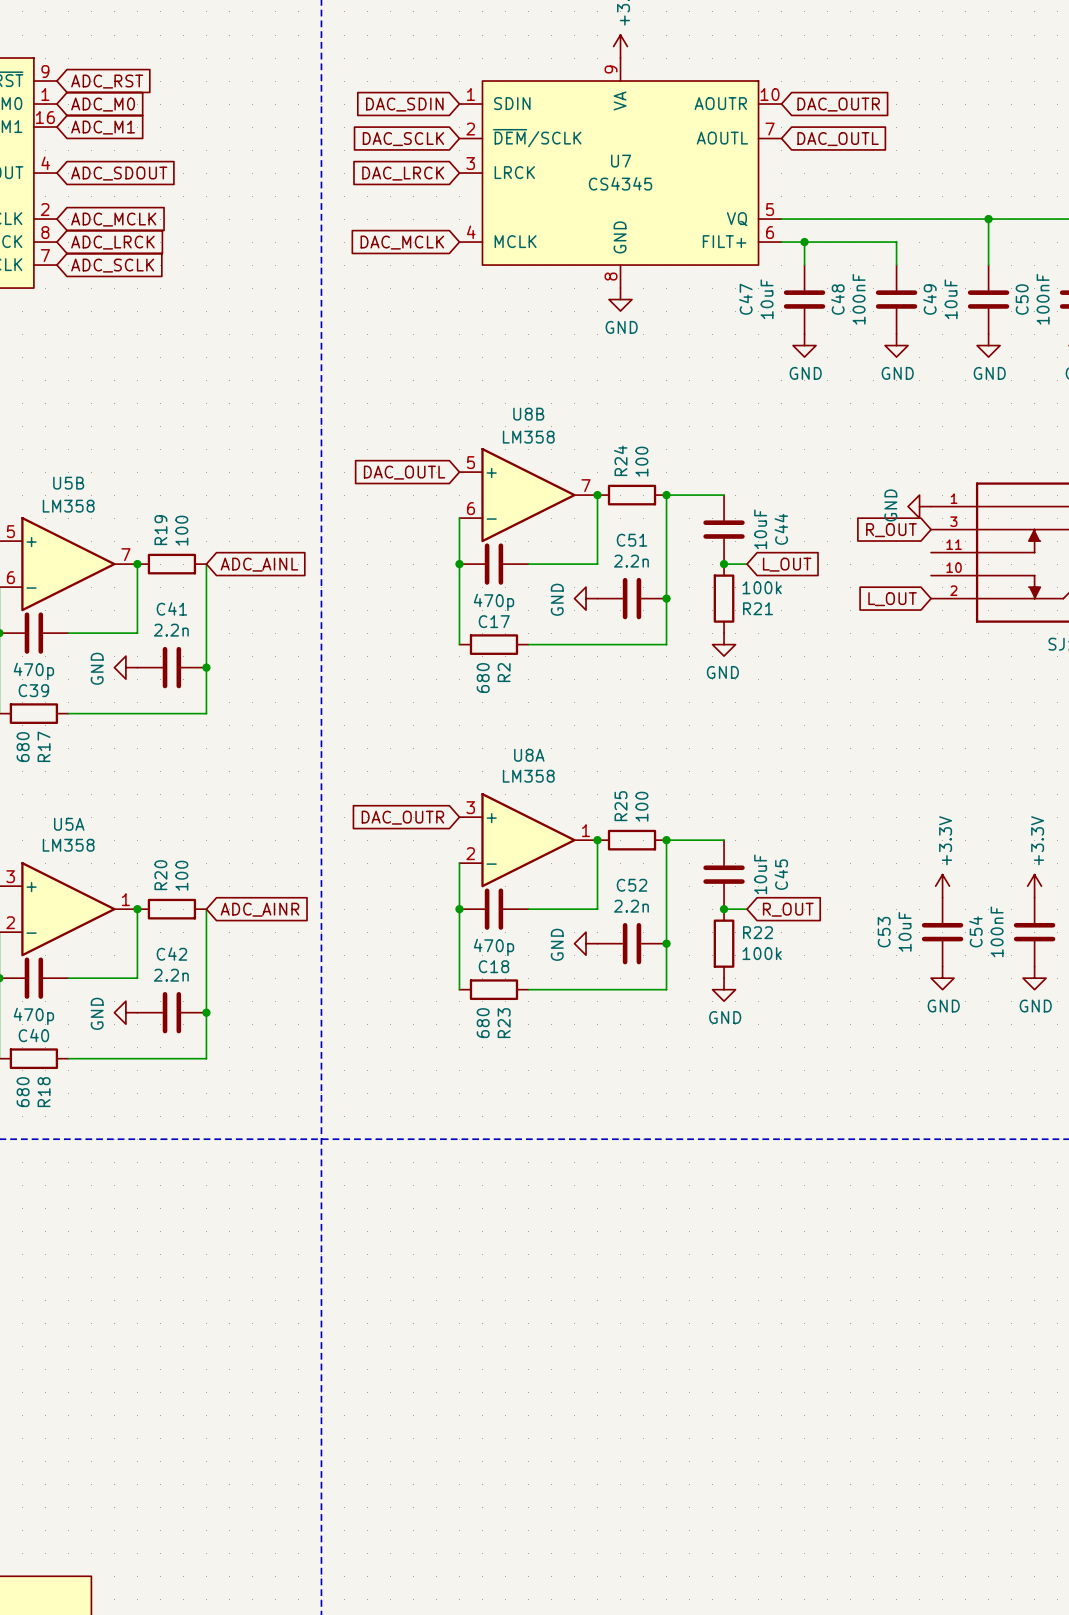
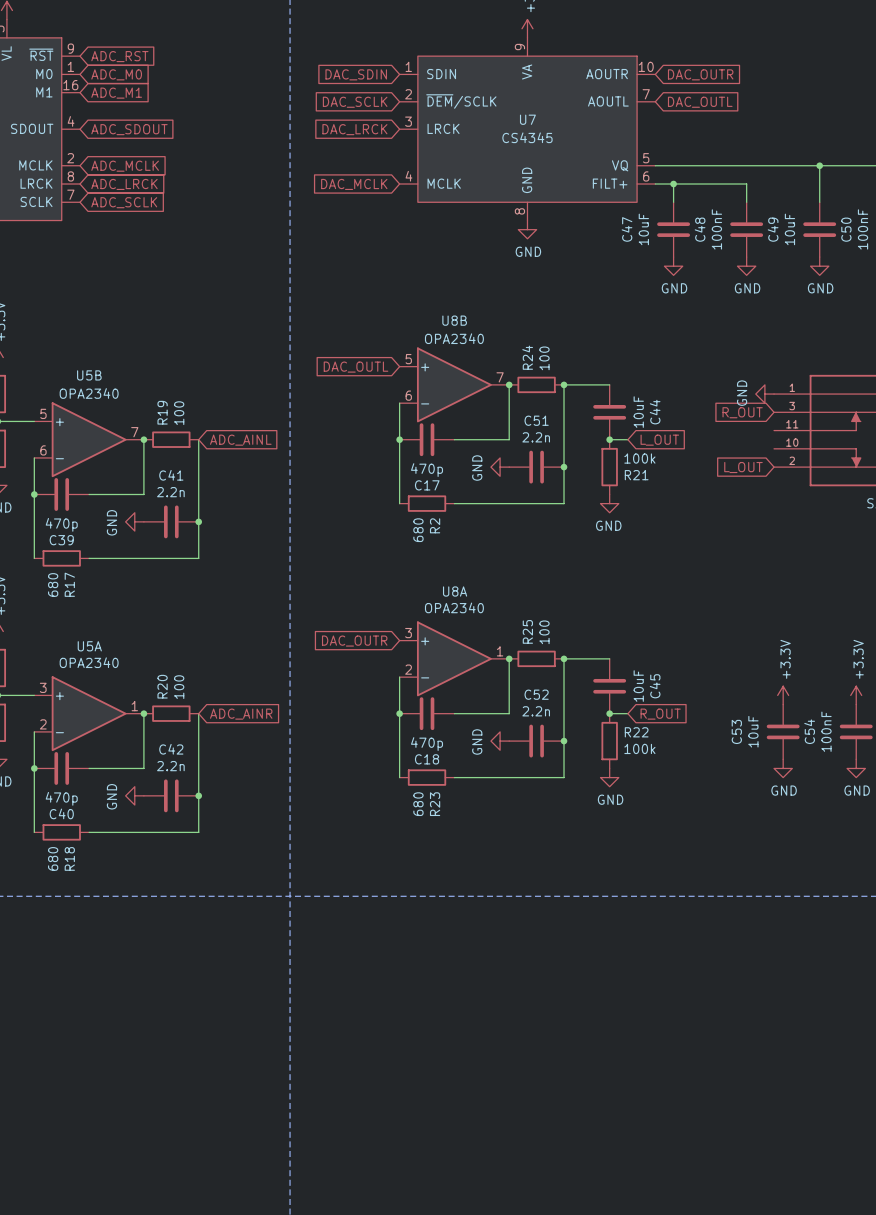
U8B value: LM358 (528, 437) -> OPA2340 (454, 338)
U5B value: LM358 (68, 506) -> OPA2340 (89, 393)
U8A value: LM358 (528, 776) -> OPA2340 (454, 607)
U5A value: LM358 (68, 845) -> OPA2340 (89, 662)

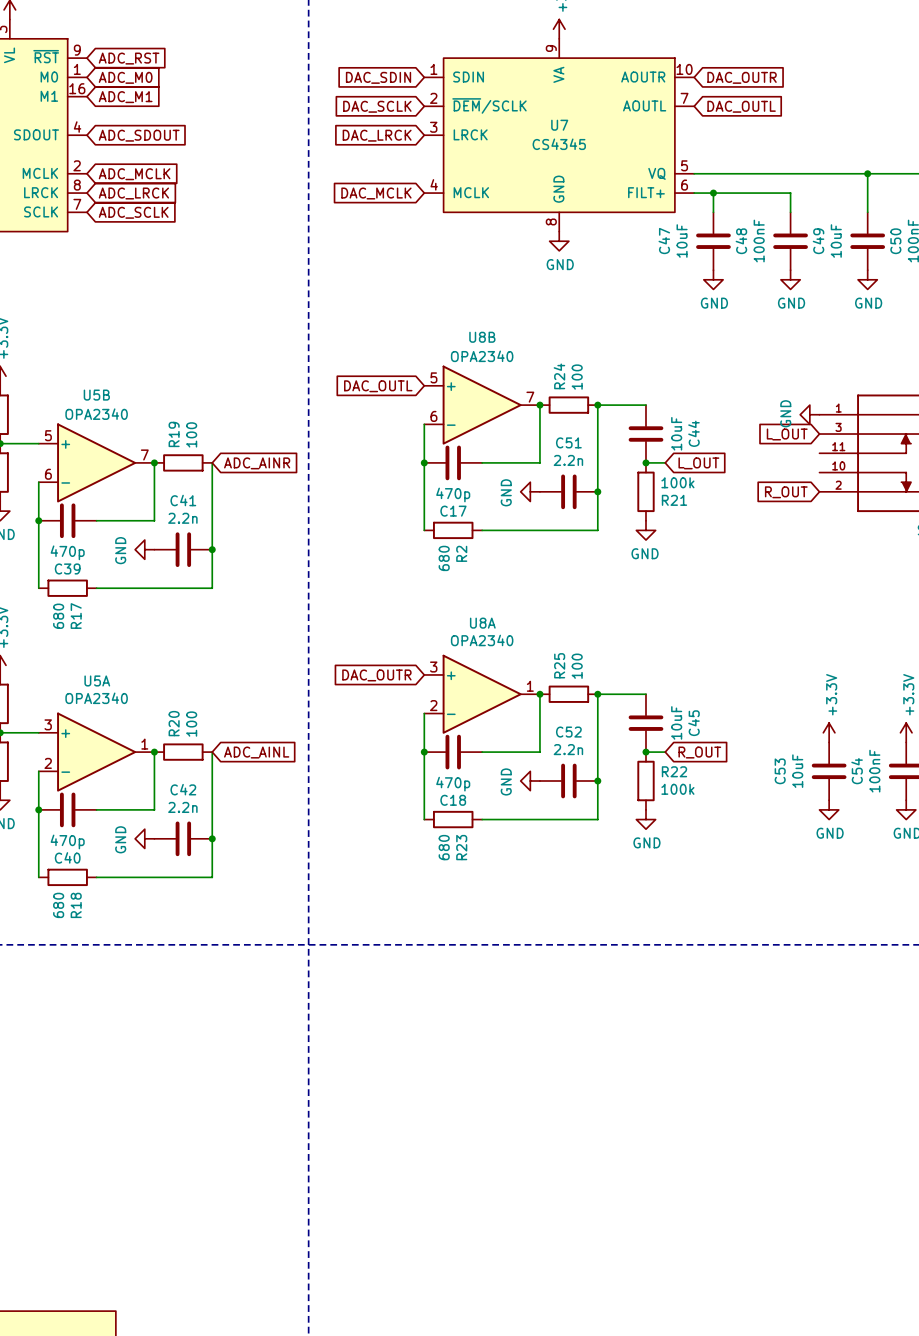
global label: R_OUT (742, 412) -> L_OUT (787, 434)
global label: ADC_AINL (240, 440) -> ADC_AINR (257, 463)
global label: L_OUT (743, 467) -> R_OUT (786, 492)
global label: ADC_AINR (241, 714) -> ADC_AINL (256, 752)

